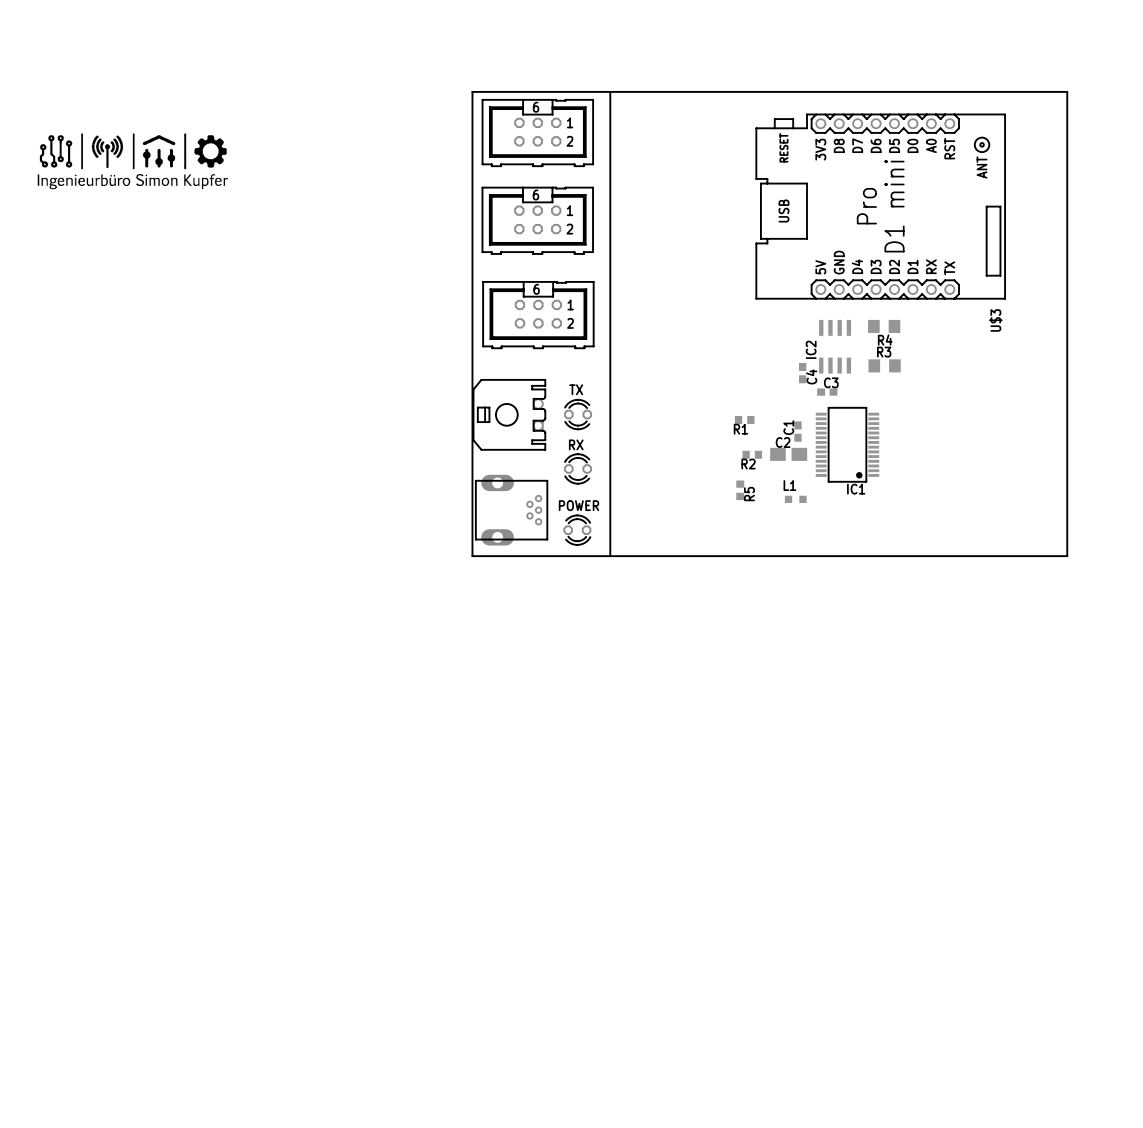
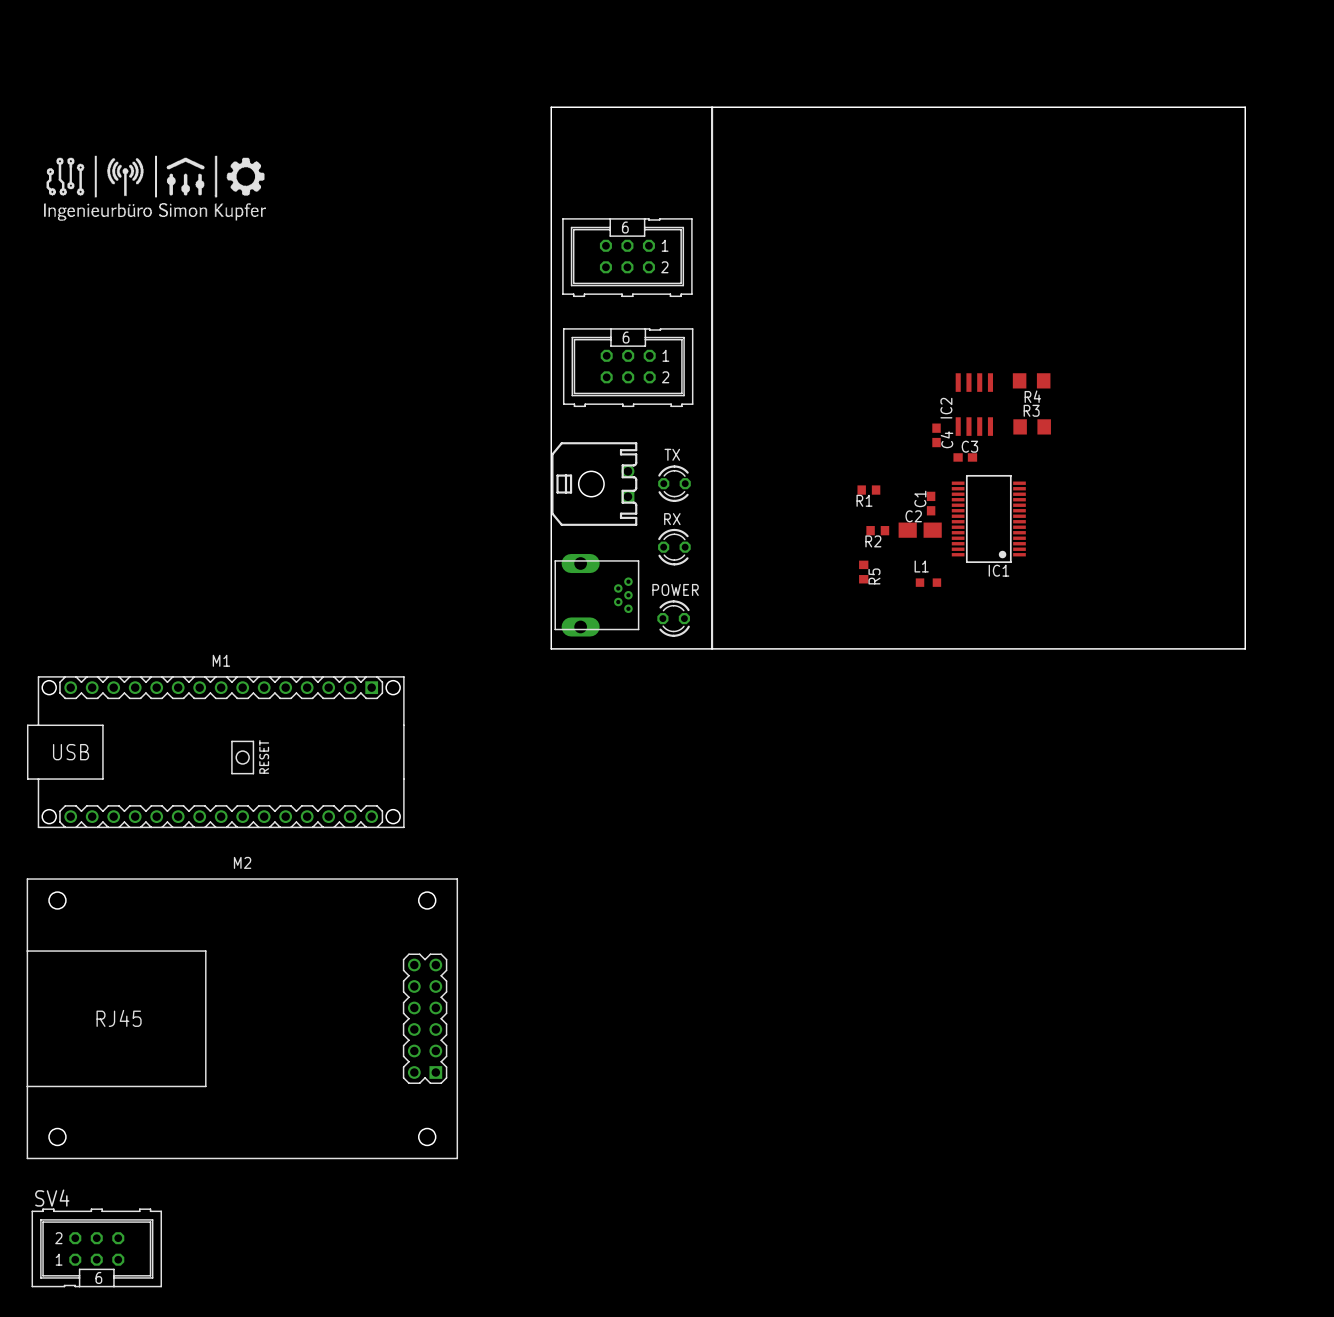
part: (537, 133) -> none
U$3: (880, 206) -> none
M1: none -> (215, 752)
M2: none -> (242, 1018)
SV4: none -> (96, 1247)

